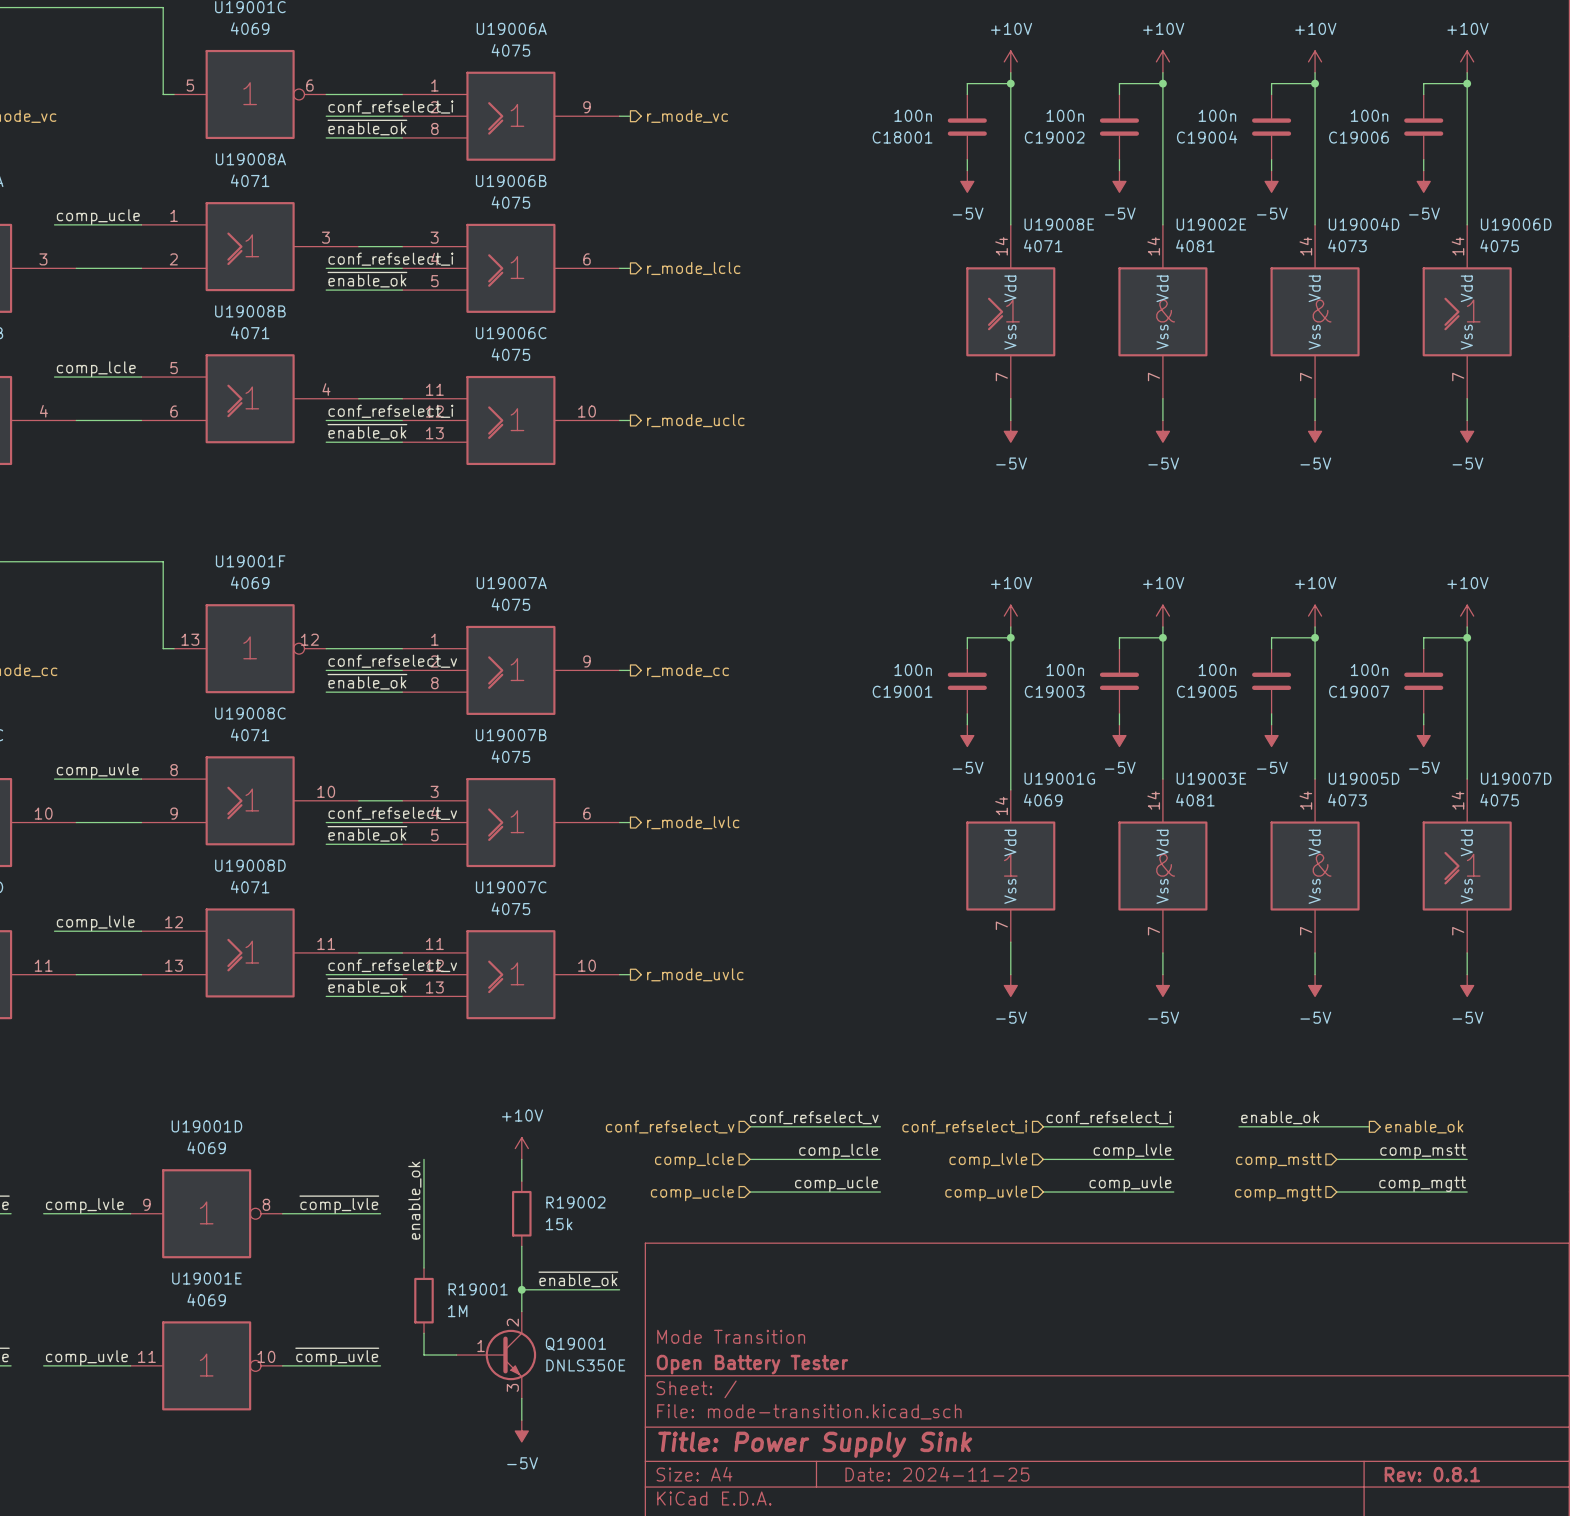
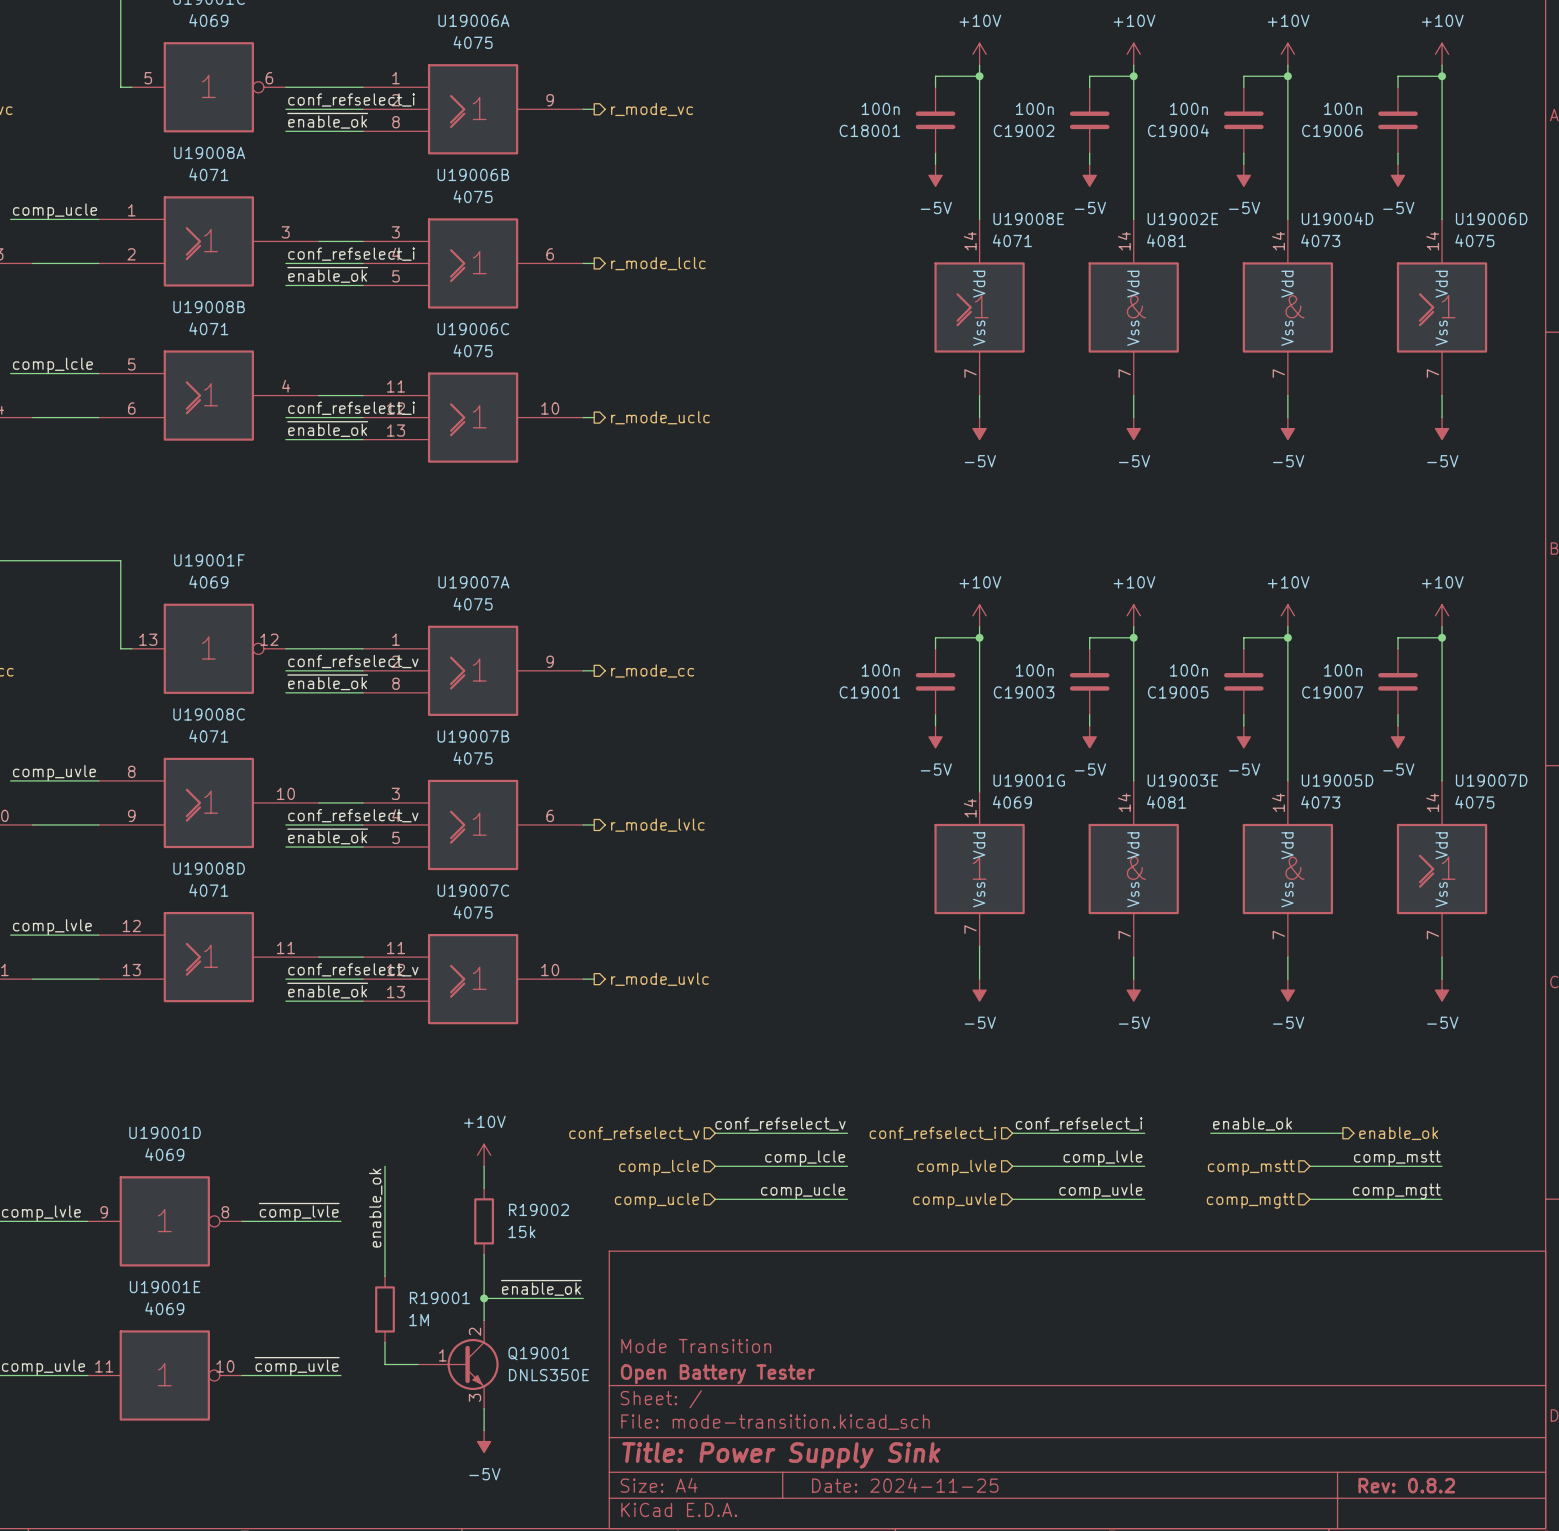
title block: Rev: 0.8.1 (1432, 1474) -> Rev: 0.8.2 (1406, 1485)

